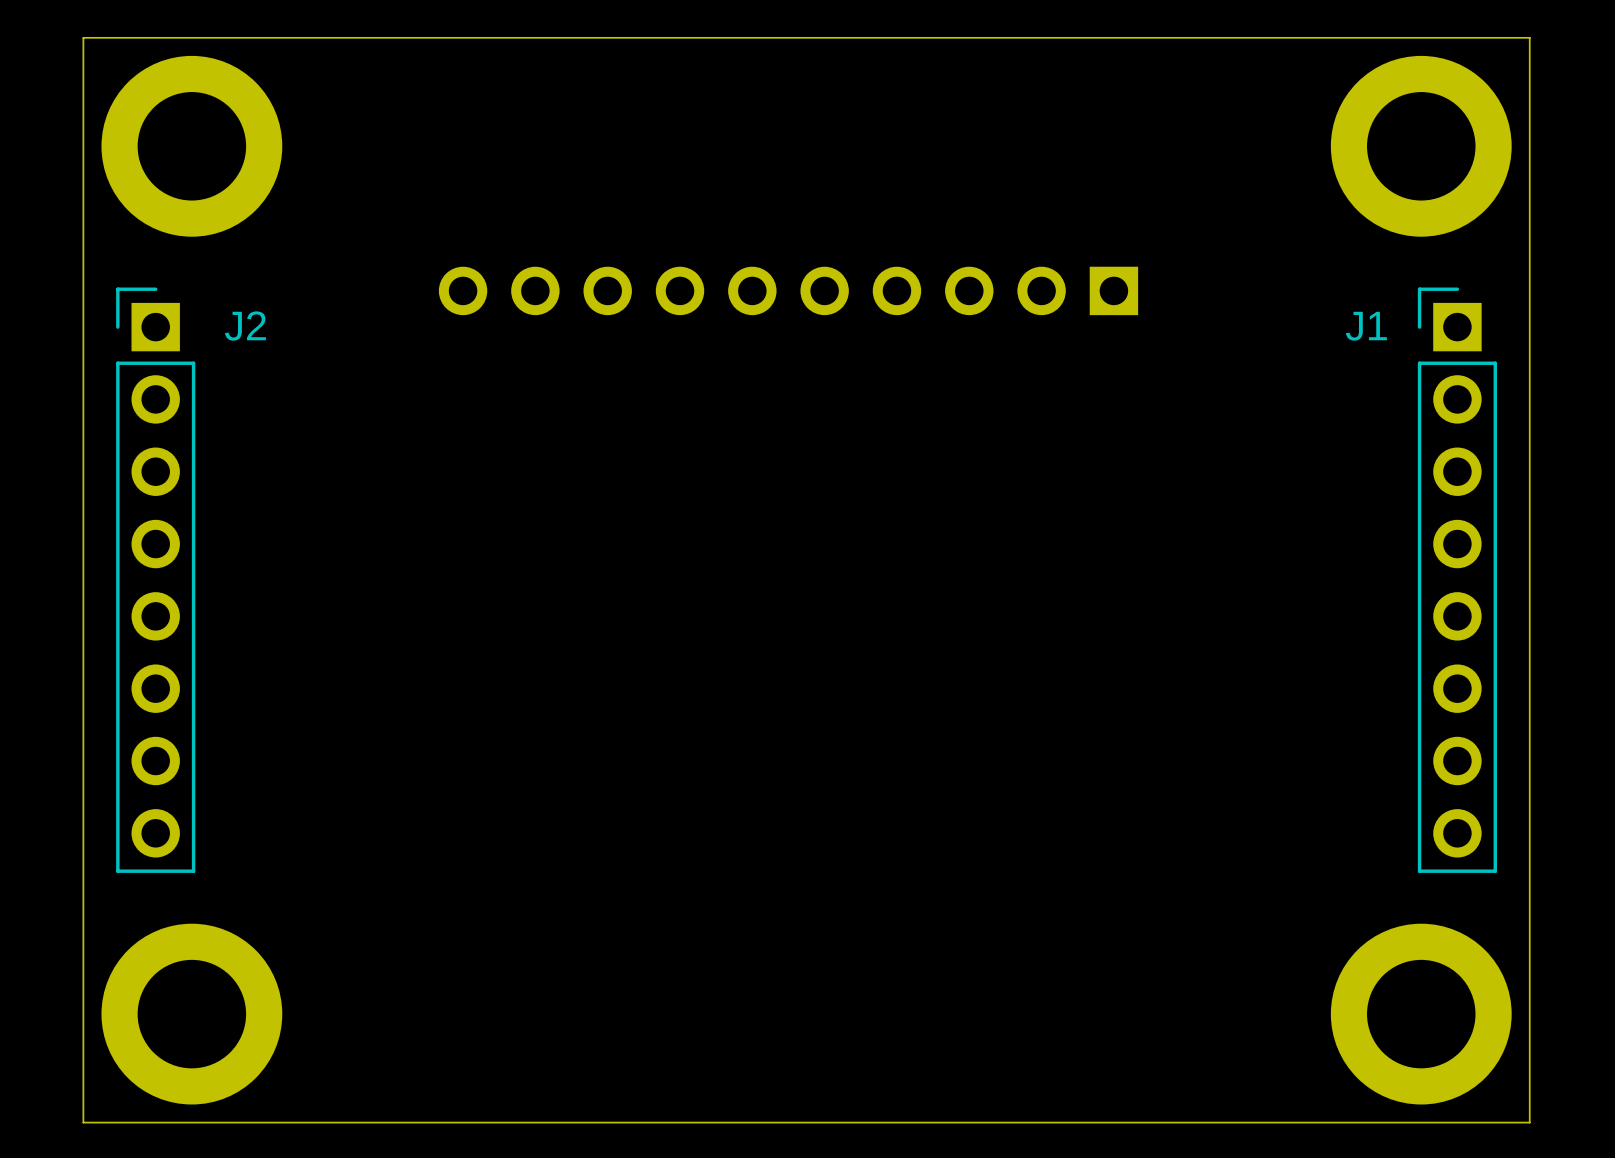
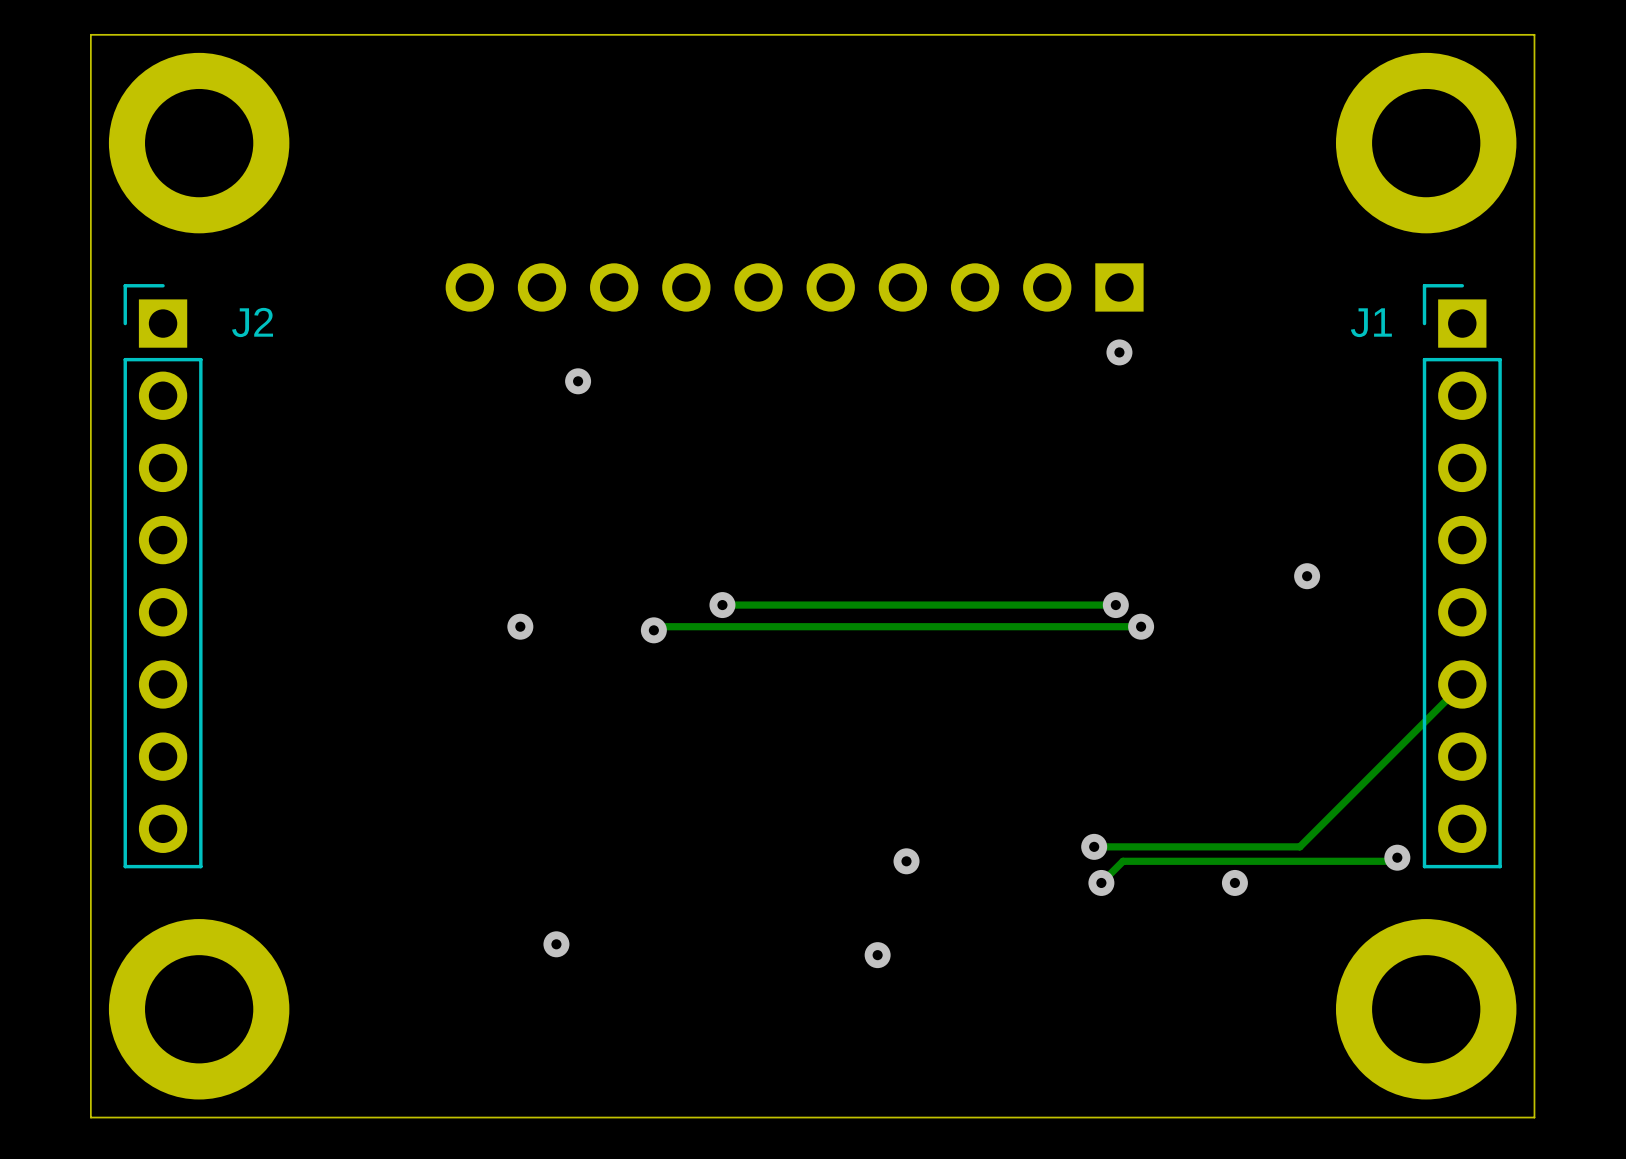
via: none -> (1119, 352)
via: none -> (578, 381)
via: none -> (1307, 576)
via: none -> (722, 605)
track: none -> (1115, 605) (722, 605)
via: none -> (1115, 605)
via: none -> (520, 626)
track: none -> (1141, 626) (657, 626) (653, 630)
via: none -> (1141, 626)
via: none -> (653, 630)
track: none -> (1462, 684) (1299, 846) (1094, 846)
via: none -> (1094, 846)
track: none -> (1397, 857) (1393, 861) (1123, 861) (1101, 882)
via: none -> (1397, 857)
via: none -> (906, 861)
via: none -> (1101, 882)
via: none -> (1234, 882)
via: none -> (556, 944)
via: none -> (877, 955)

